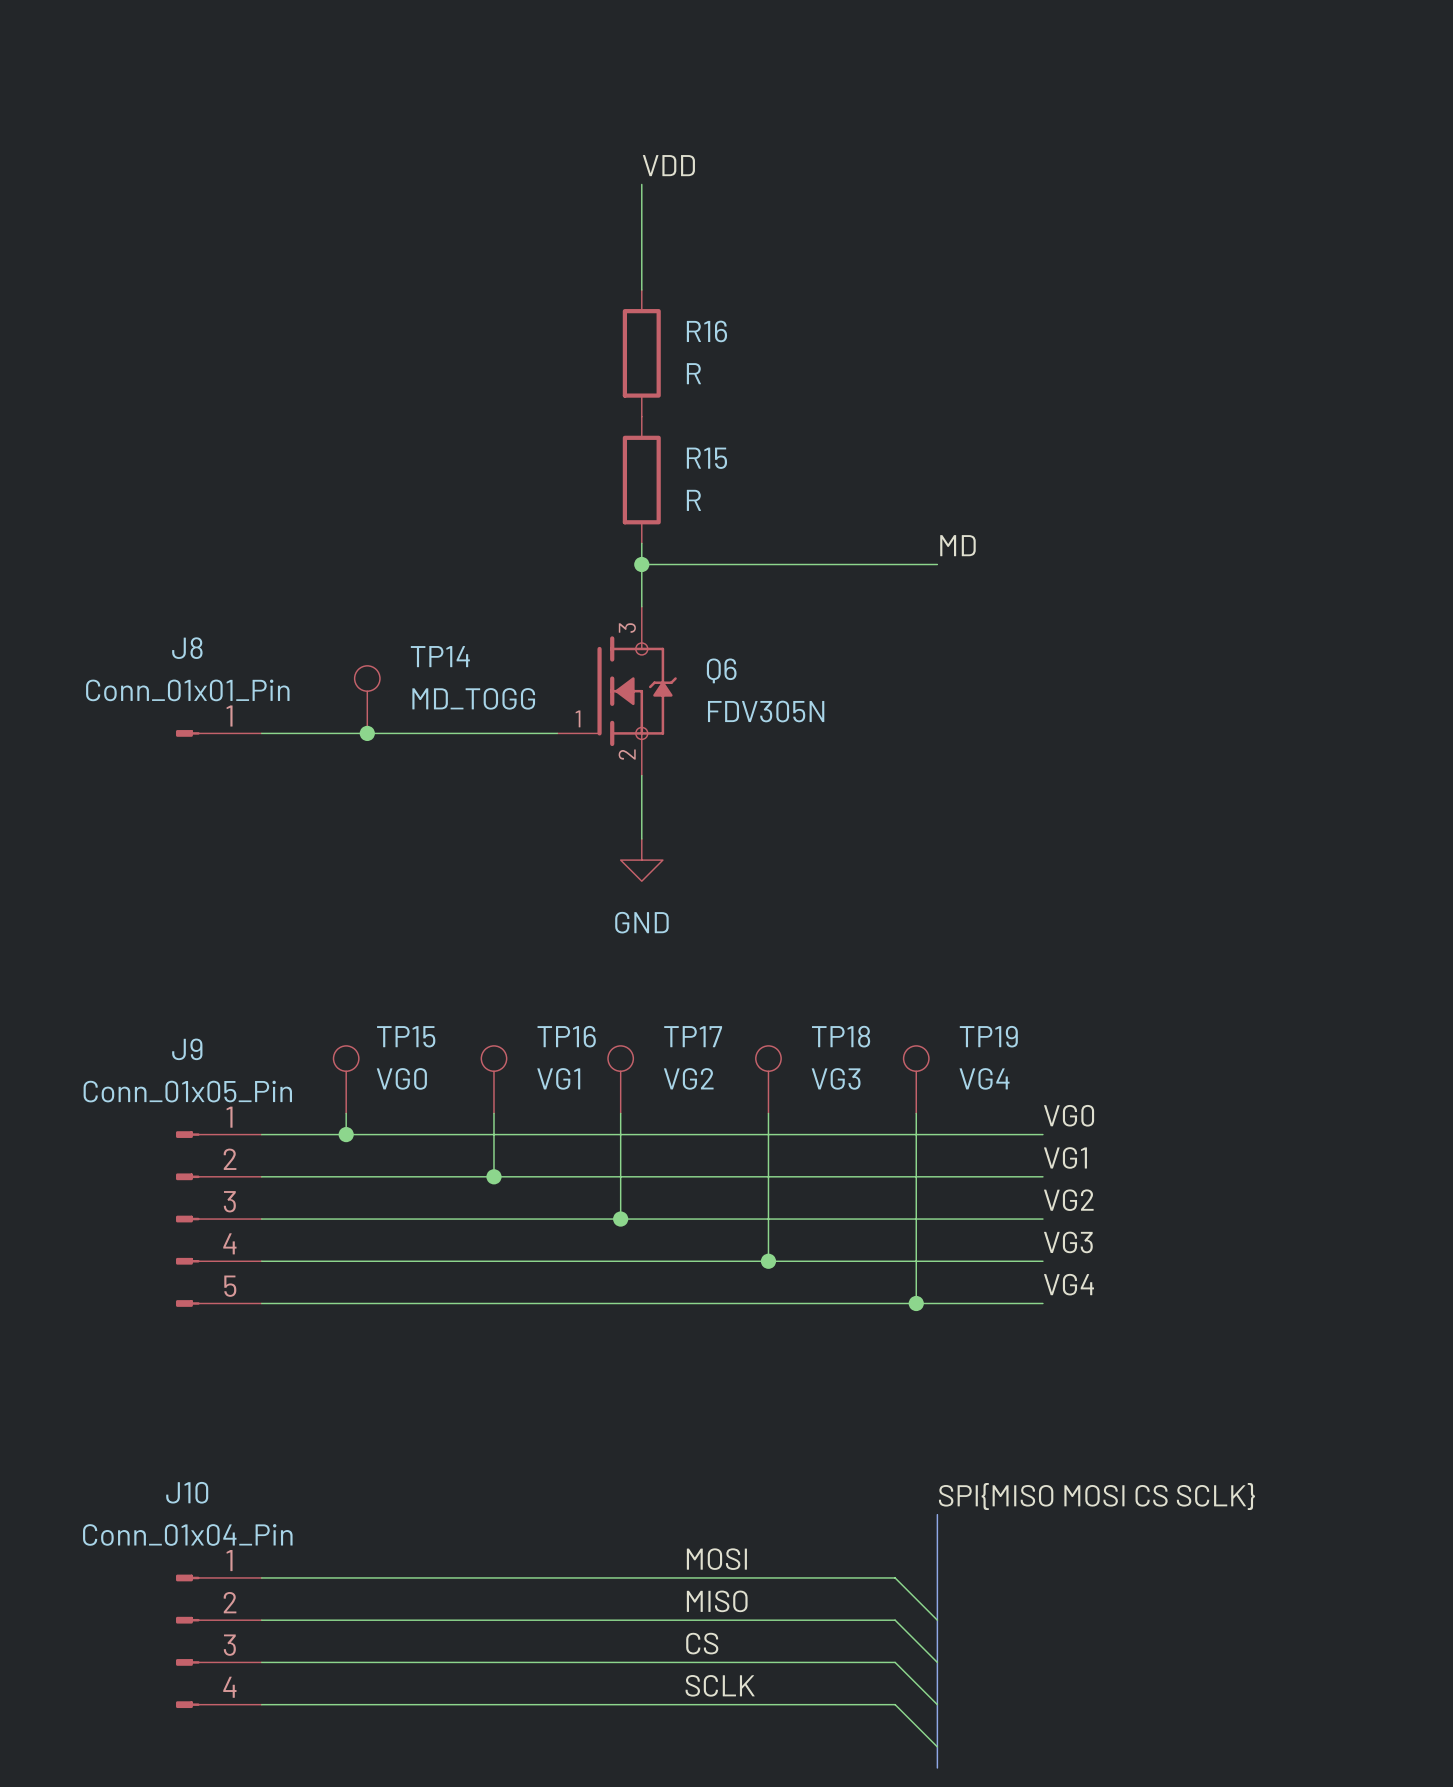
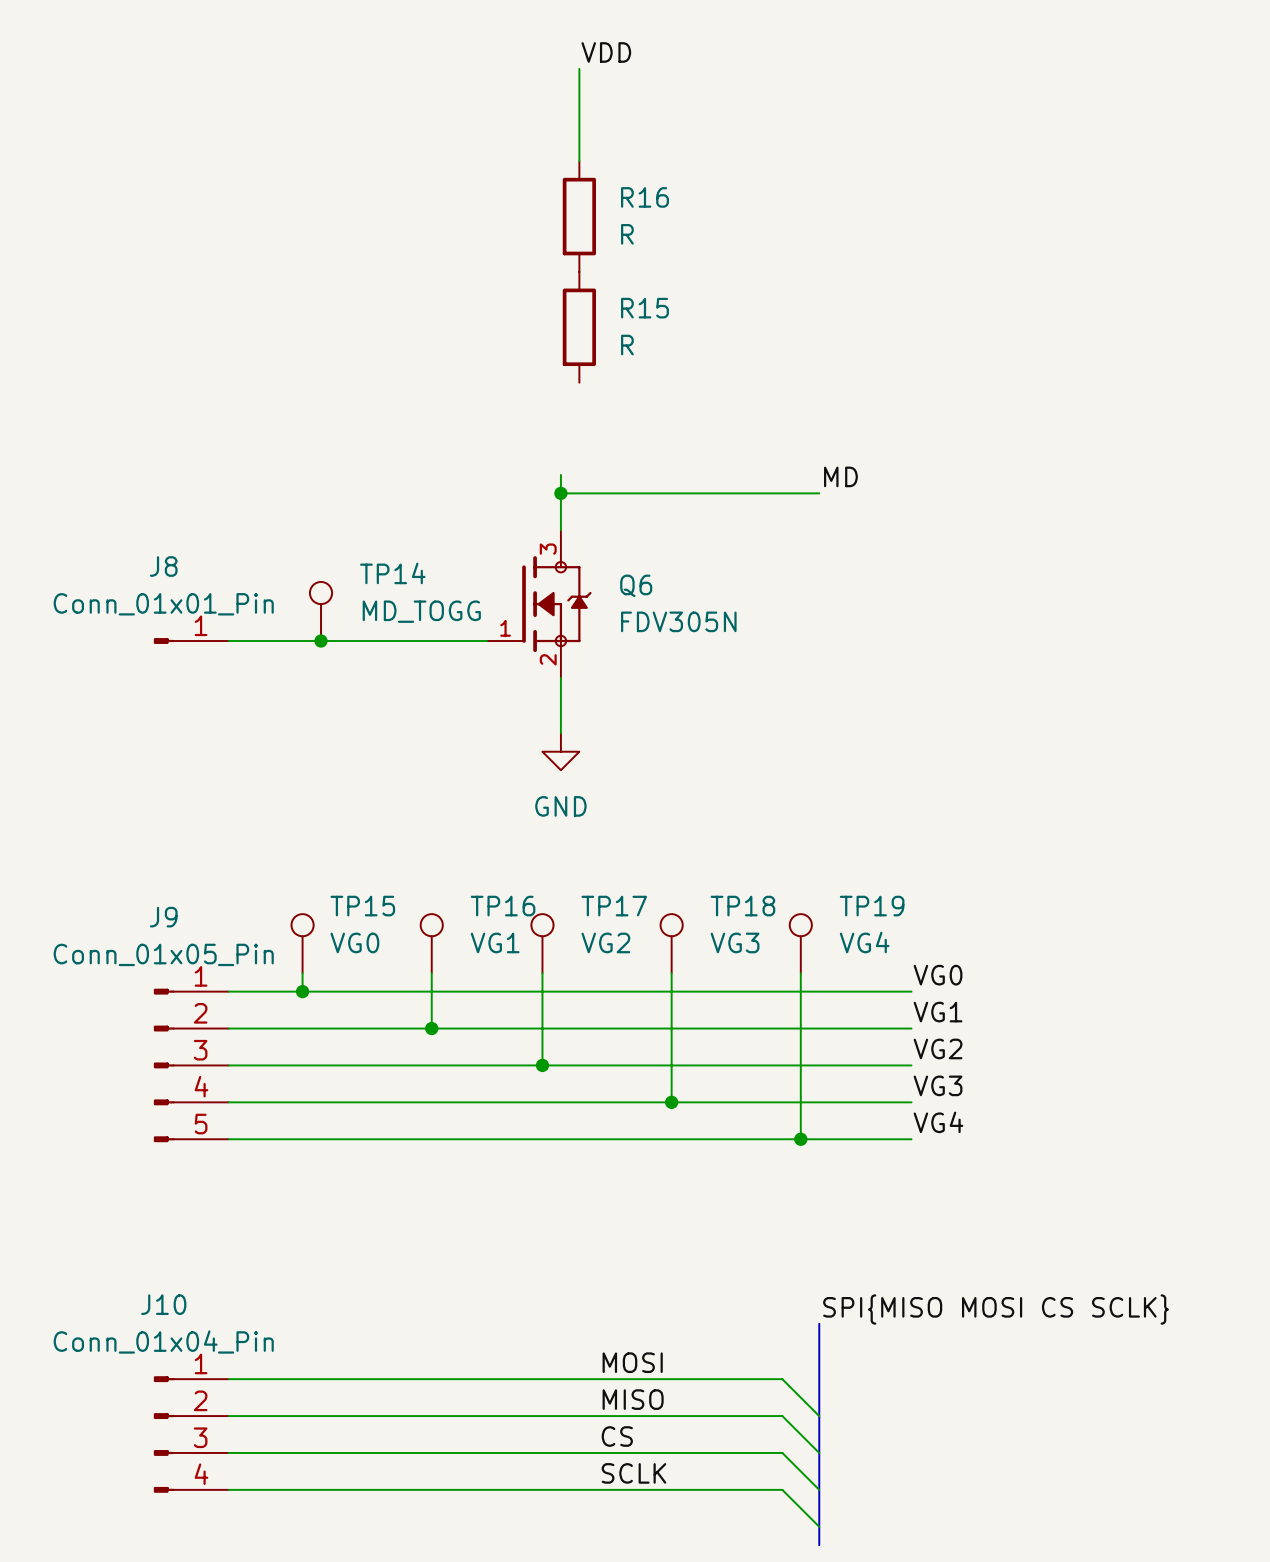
label position: VDD (668, 165) -> VDD (606, 52)
wire: (641, 184) (641, 290) -> (579, 68) (579, 161)
R16 position: (641, 353) -> (579, 216)
R15 position: (641, 480) -> (579, 327)

